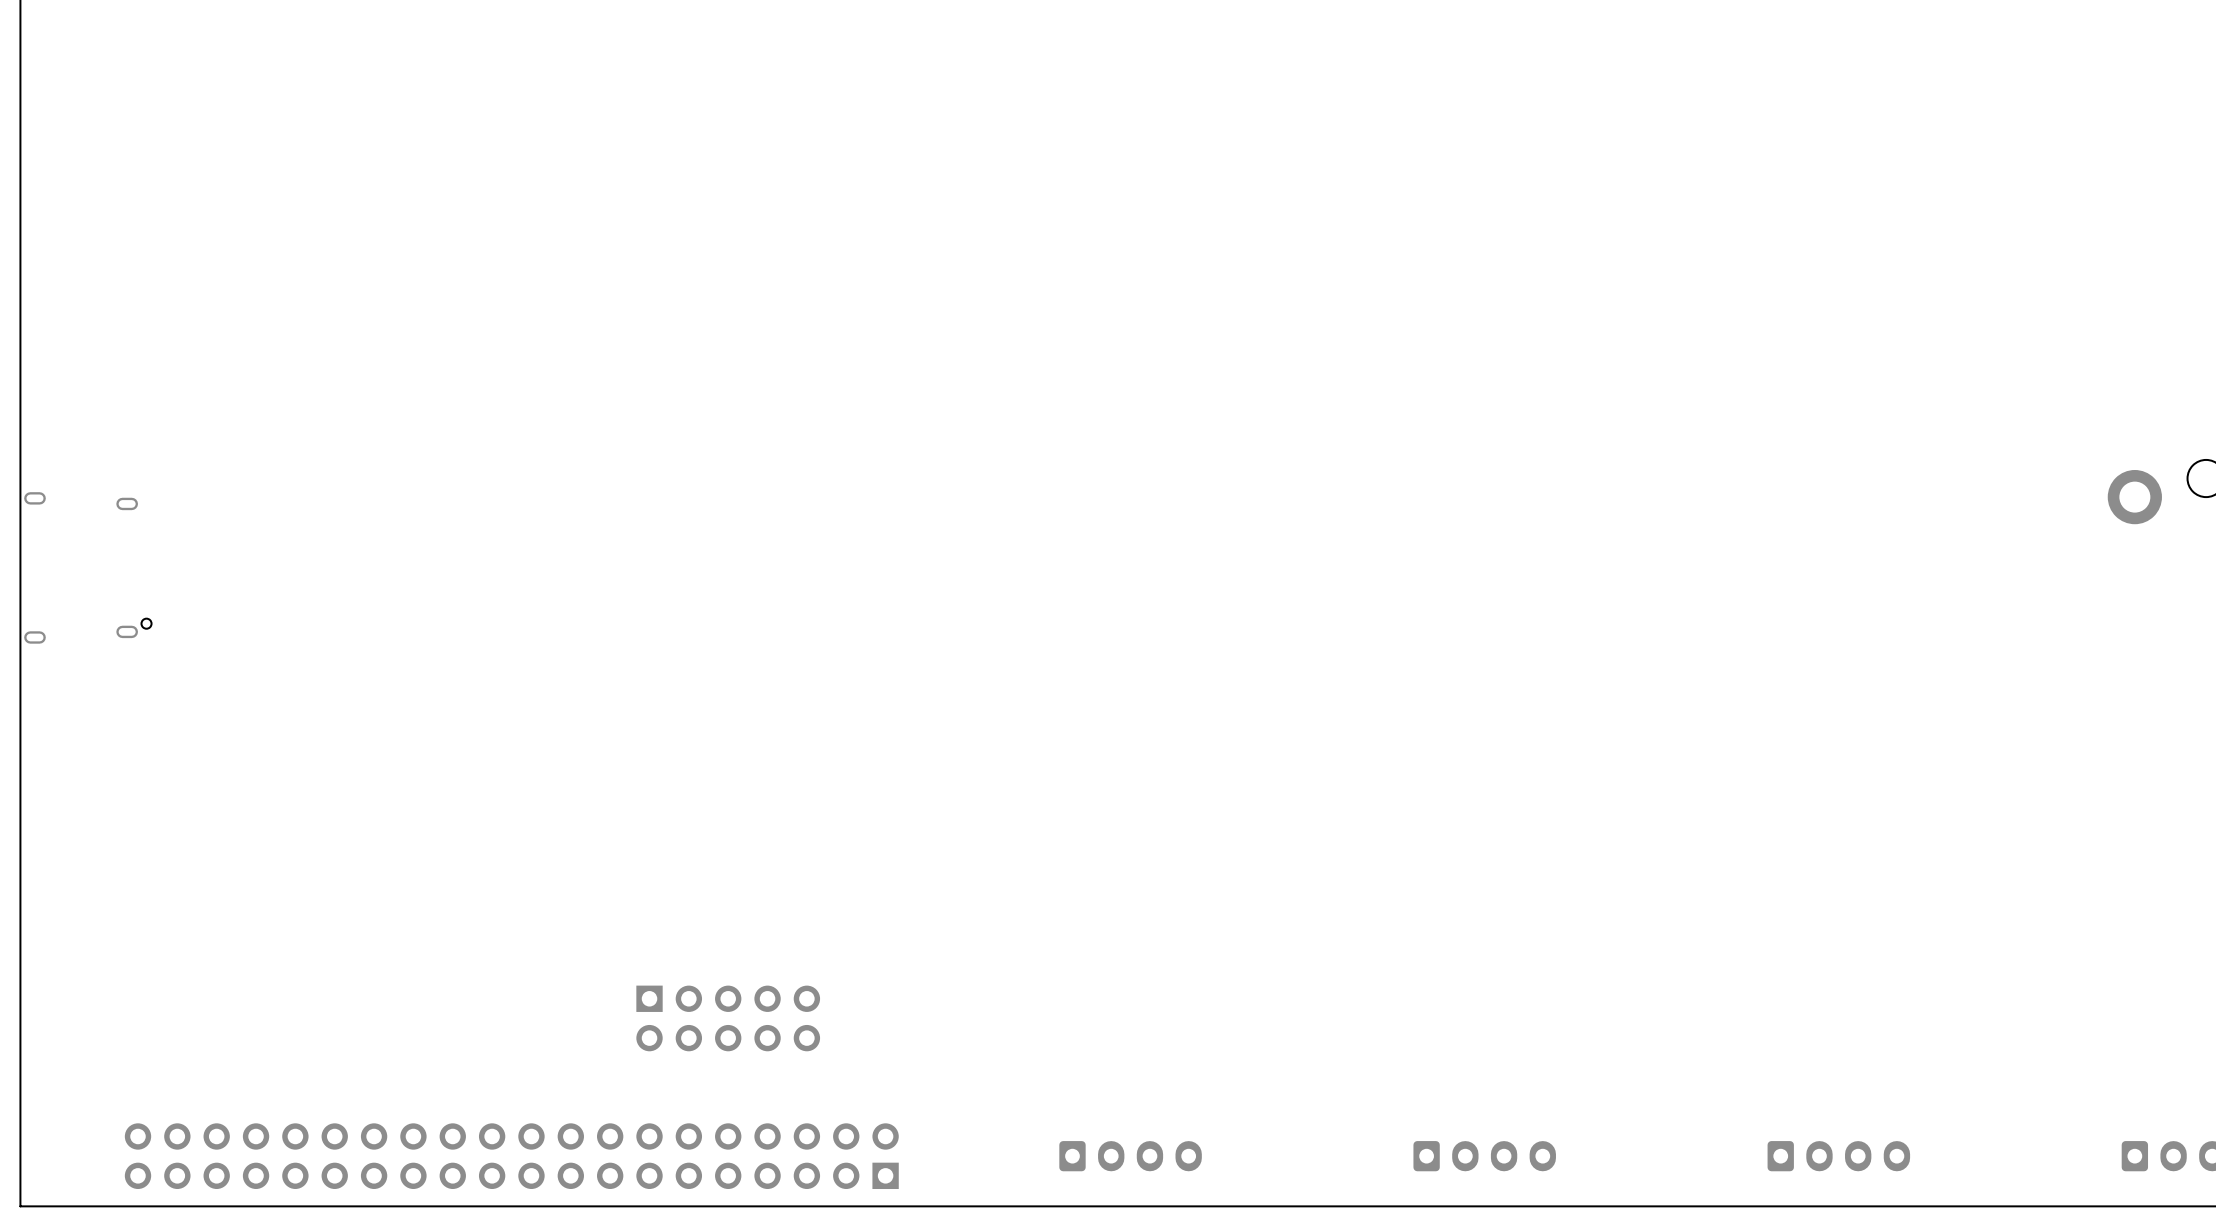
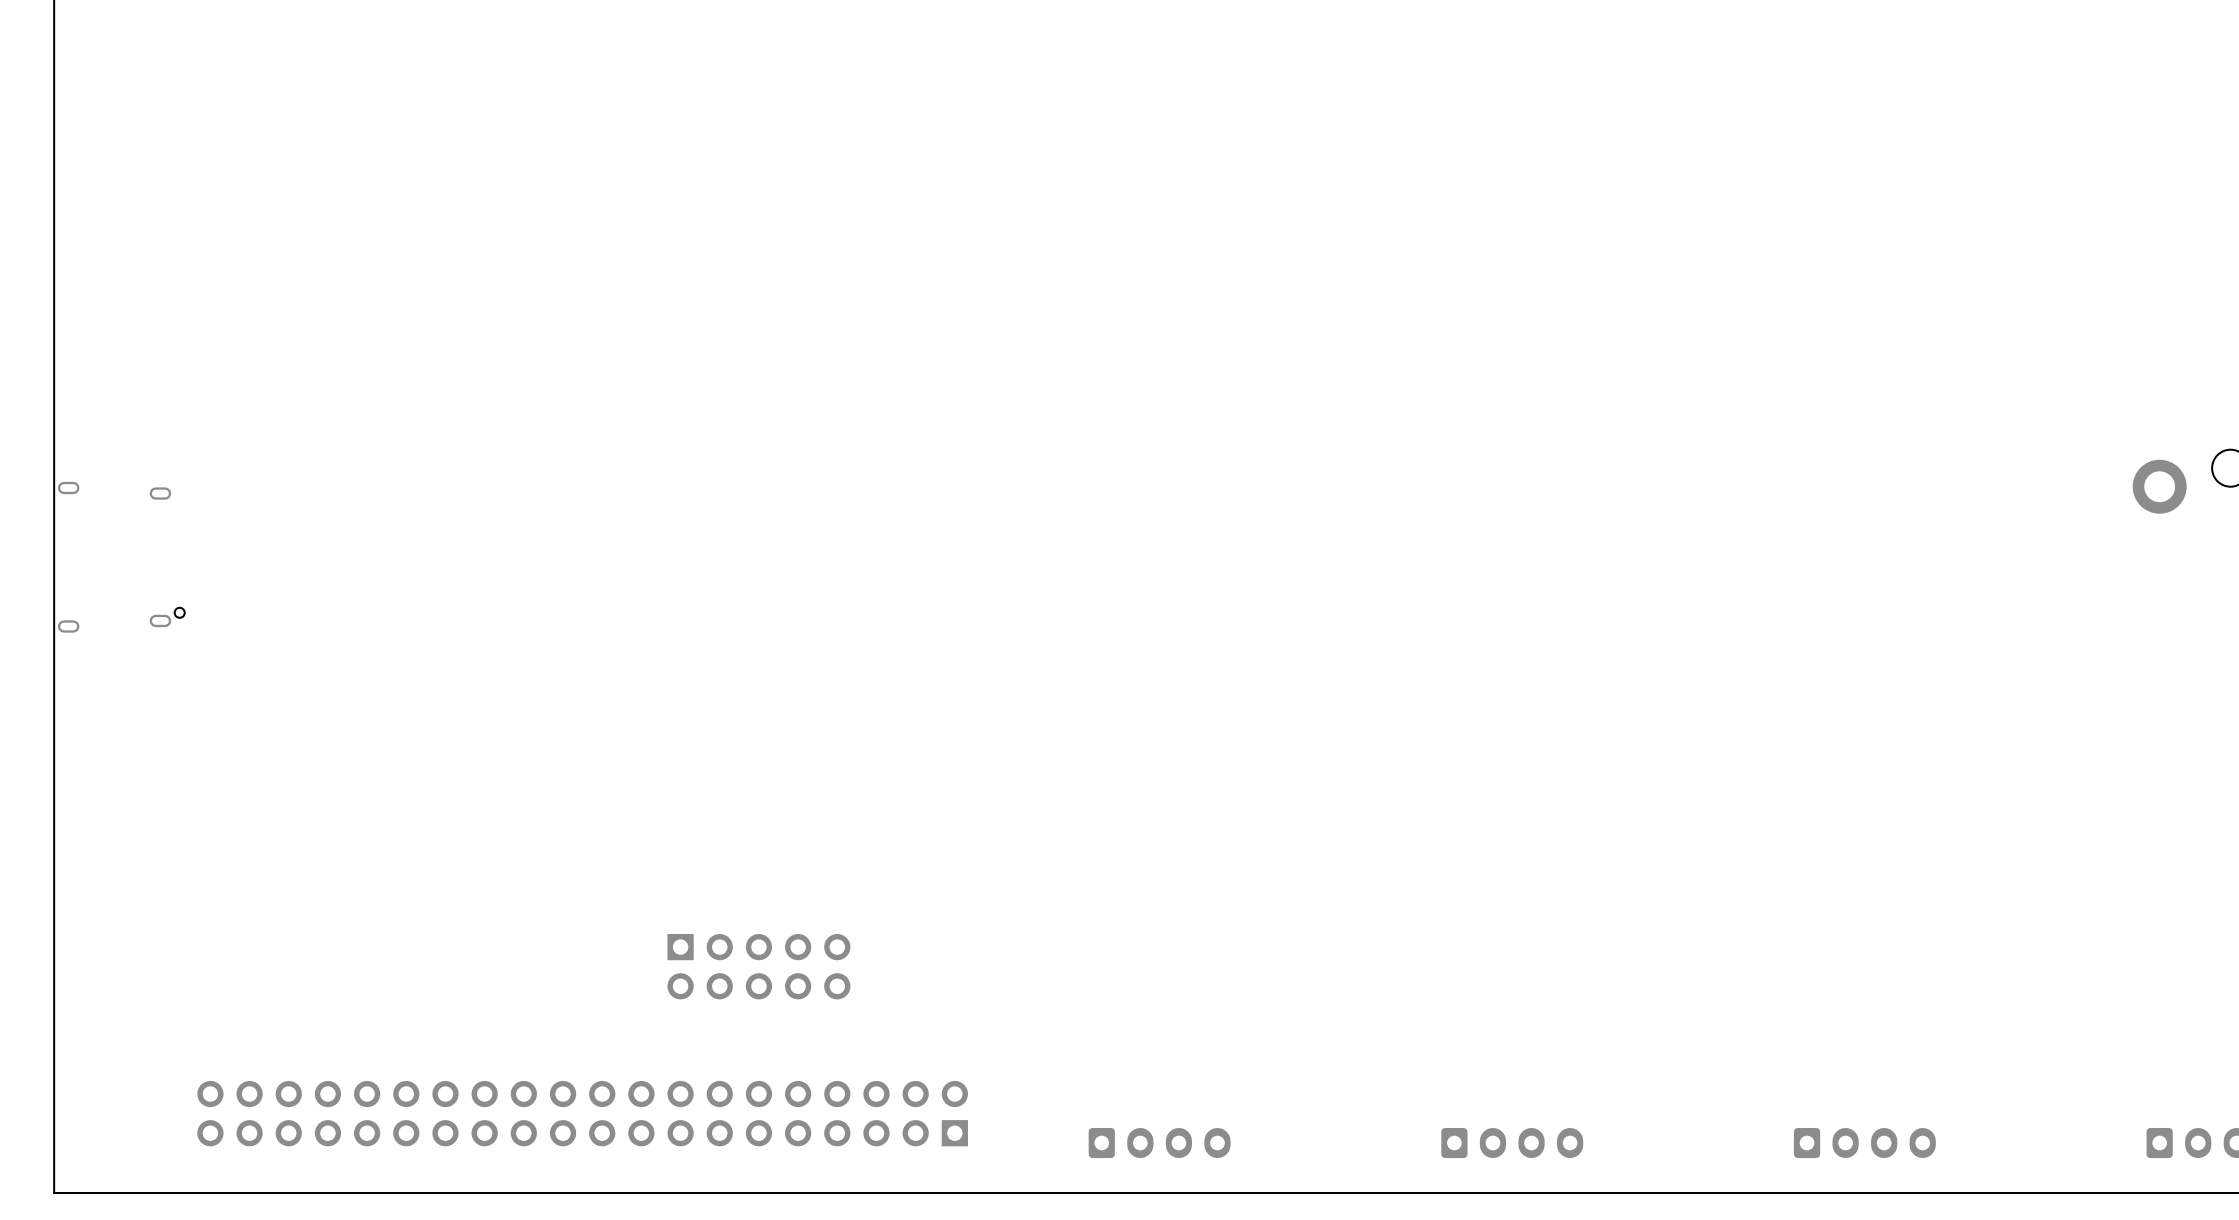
part position: (728, 1018) -> (758, 966)
part position: (511, 1156) -> (582, 1113)

